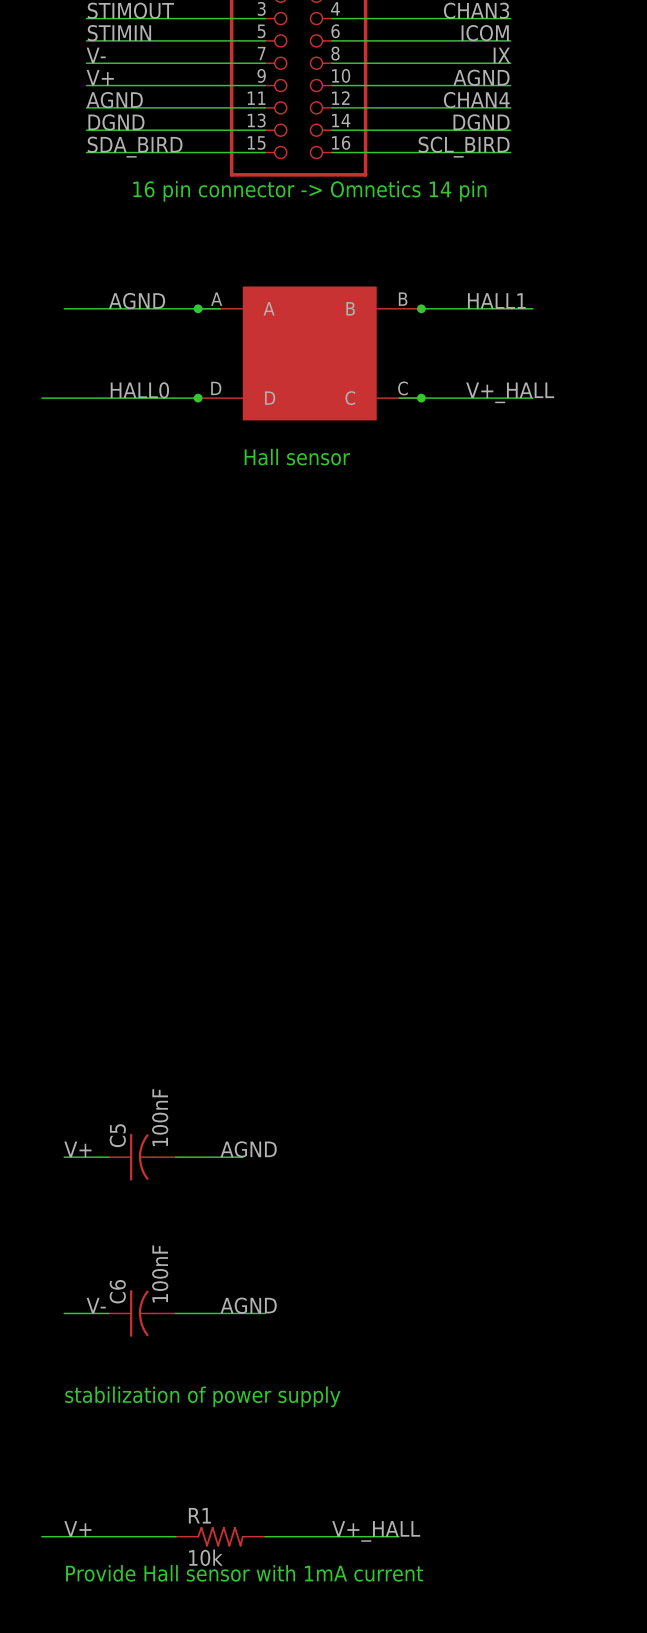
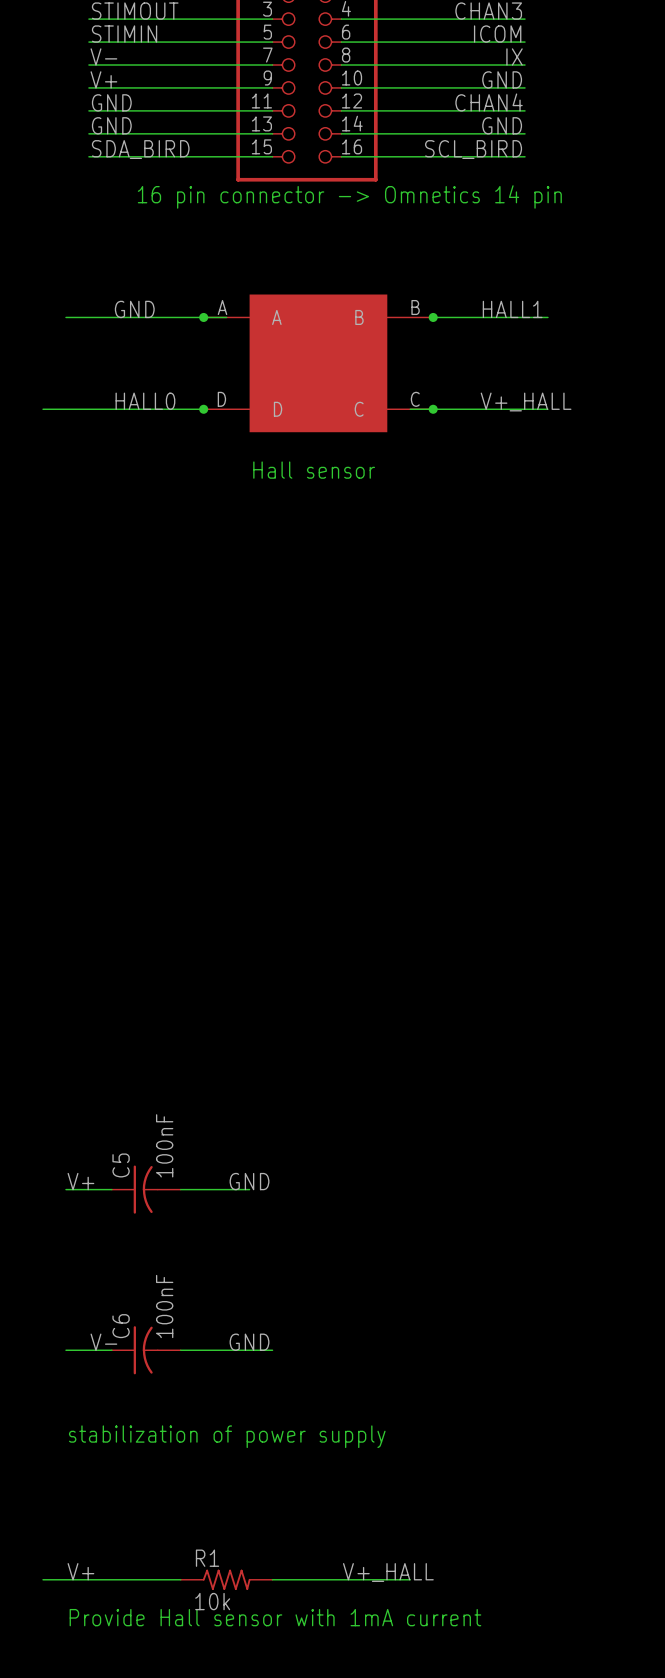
label: AGND (481, 77) -> GND (502, 79)
label: AGND (114, 100) -> GND (111, 102)
label: DGND (116, 122) -> GND (111, 125)
label: DGND (481, 122) -> GND (502, 125)
label: AGND (137, 301) -> GND (134, 309)
label: AGND (248, 1149) -> GND (249, 1181)
label: AGND (248, 1305) -> GND (249, 1342)

